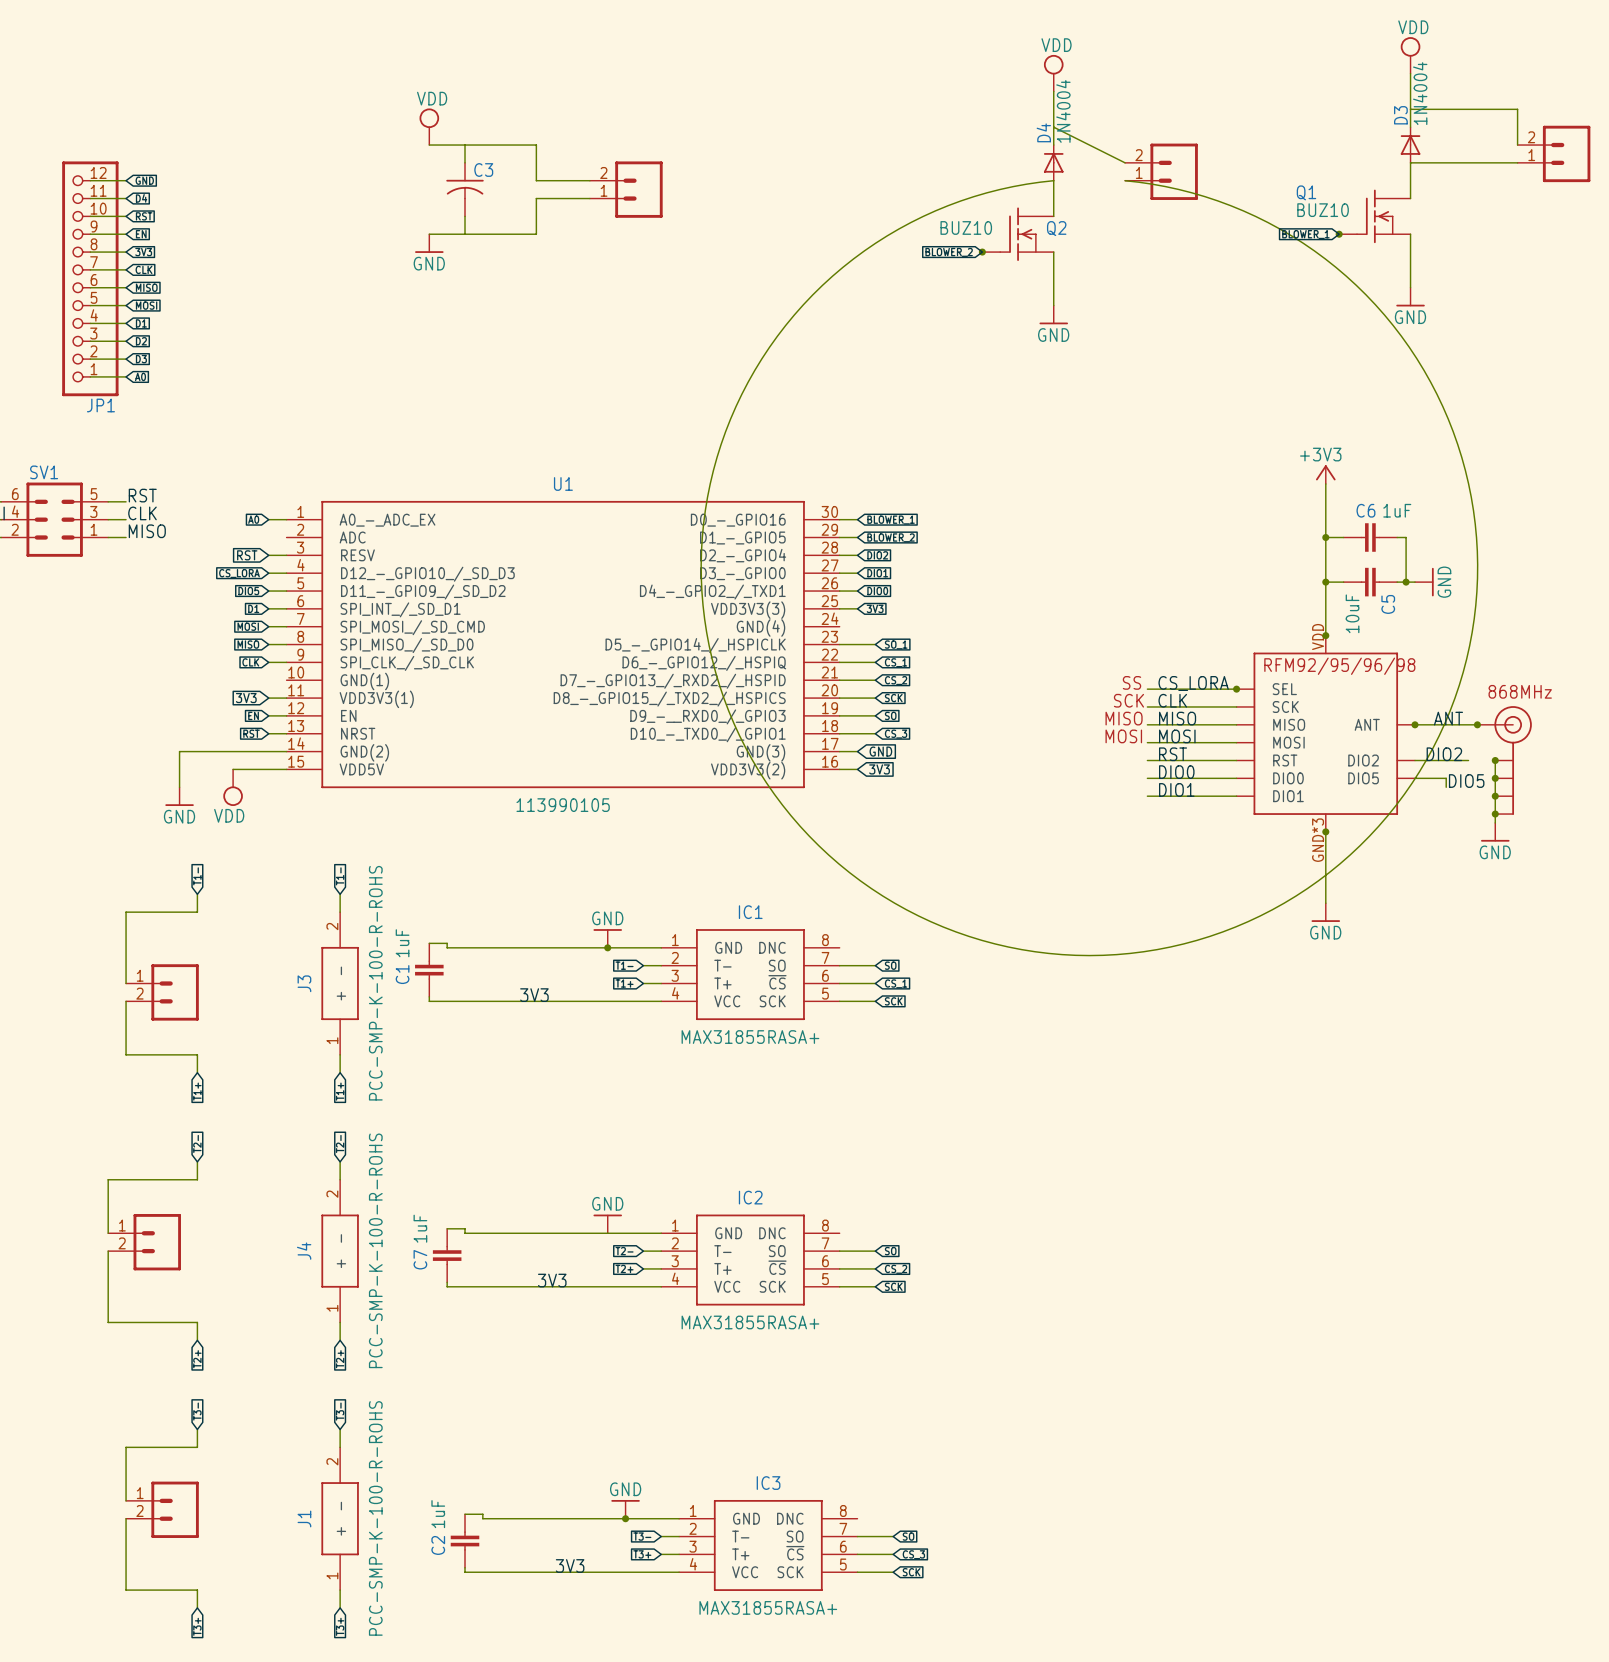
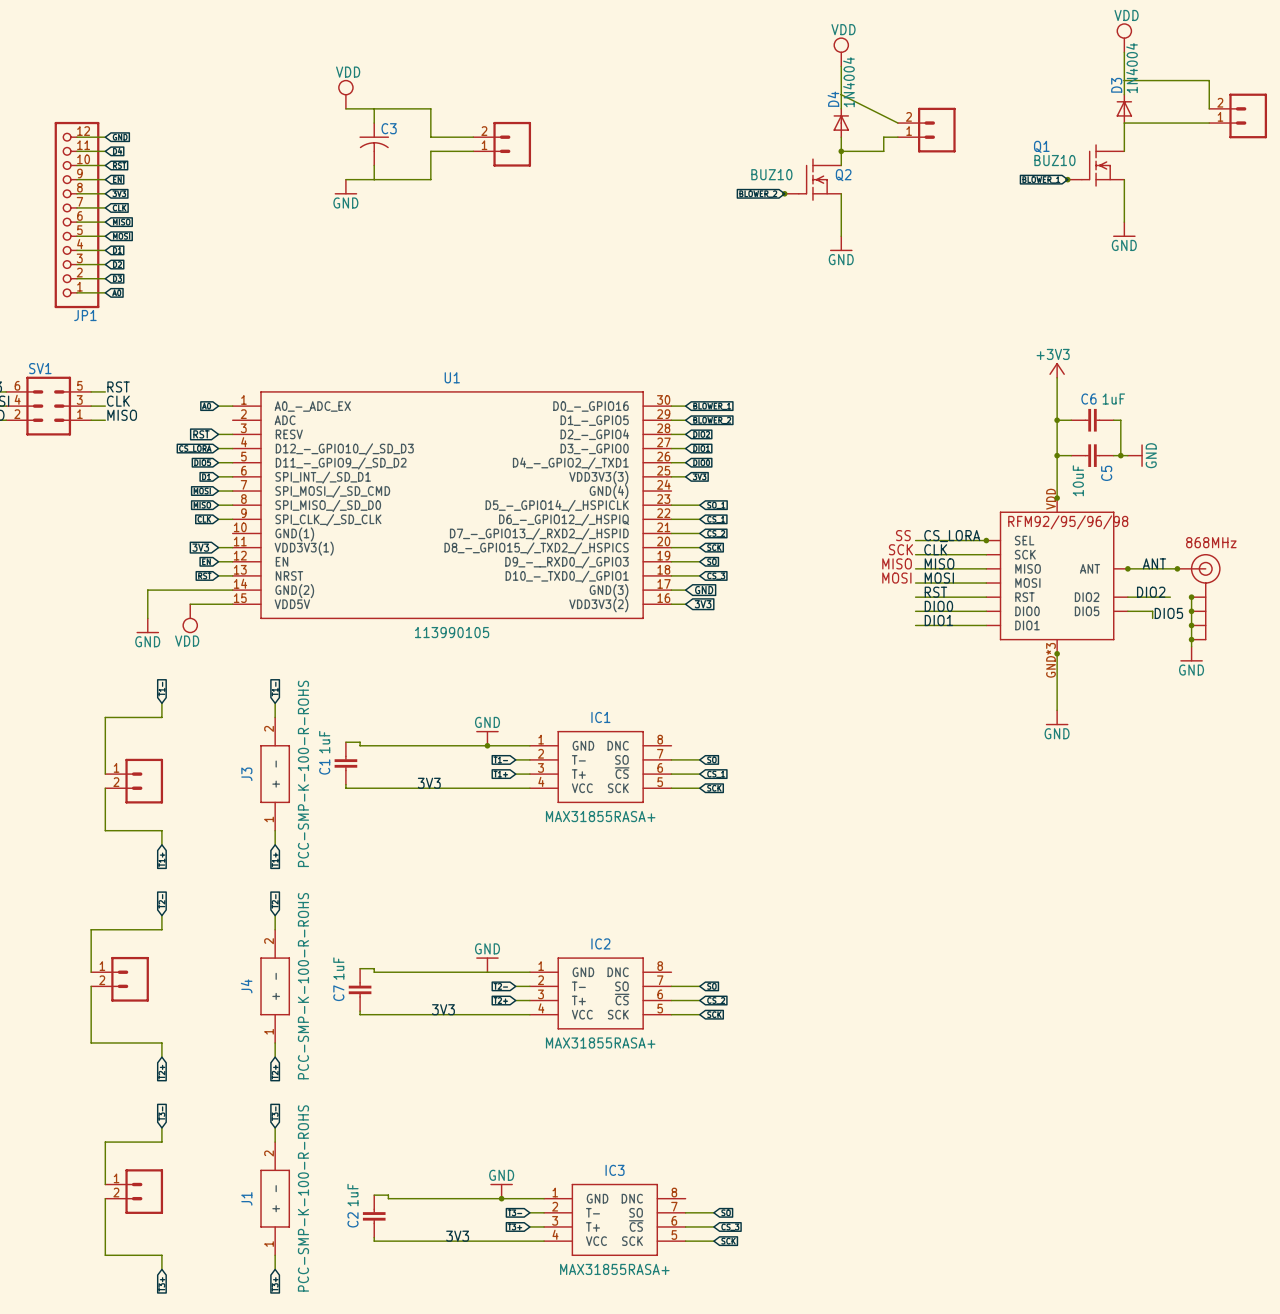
wire: (1053, 180) (986, 192) (948, 205) (910, 222) (875, 243) (842, 267) (794, 314) (754, 370) (736, 406) (721, 444) (705, 510) (701, 578) (704, 619) (712, 659) (733, 723) (752, 759) (774, 794) (818, 845) (871, 888) (906, 909) (943, 927) (1008, 947) (1048, 953) (1089, 955) (1130, 953) (1170, 947) (1235, 927) (1295, 896) (1329, 872) (1360, 845) (1387, 815) (1412, 783) (1444, 723) (1466, 659) (1474, 619) (1477, 578) (1476, 537) (1471, 497) (1453, 431) (1423, 370) (1384, 314) (1356, 285) (1325, 258) (1267, 222) (1230, 205) (1191, 192) (1125, 180) -> (841, 151) (883, 151) (883, 137) (897, 137)
junction: none -> (841, 151)

